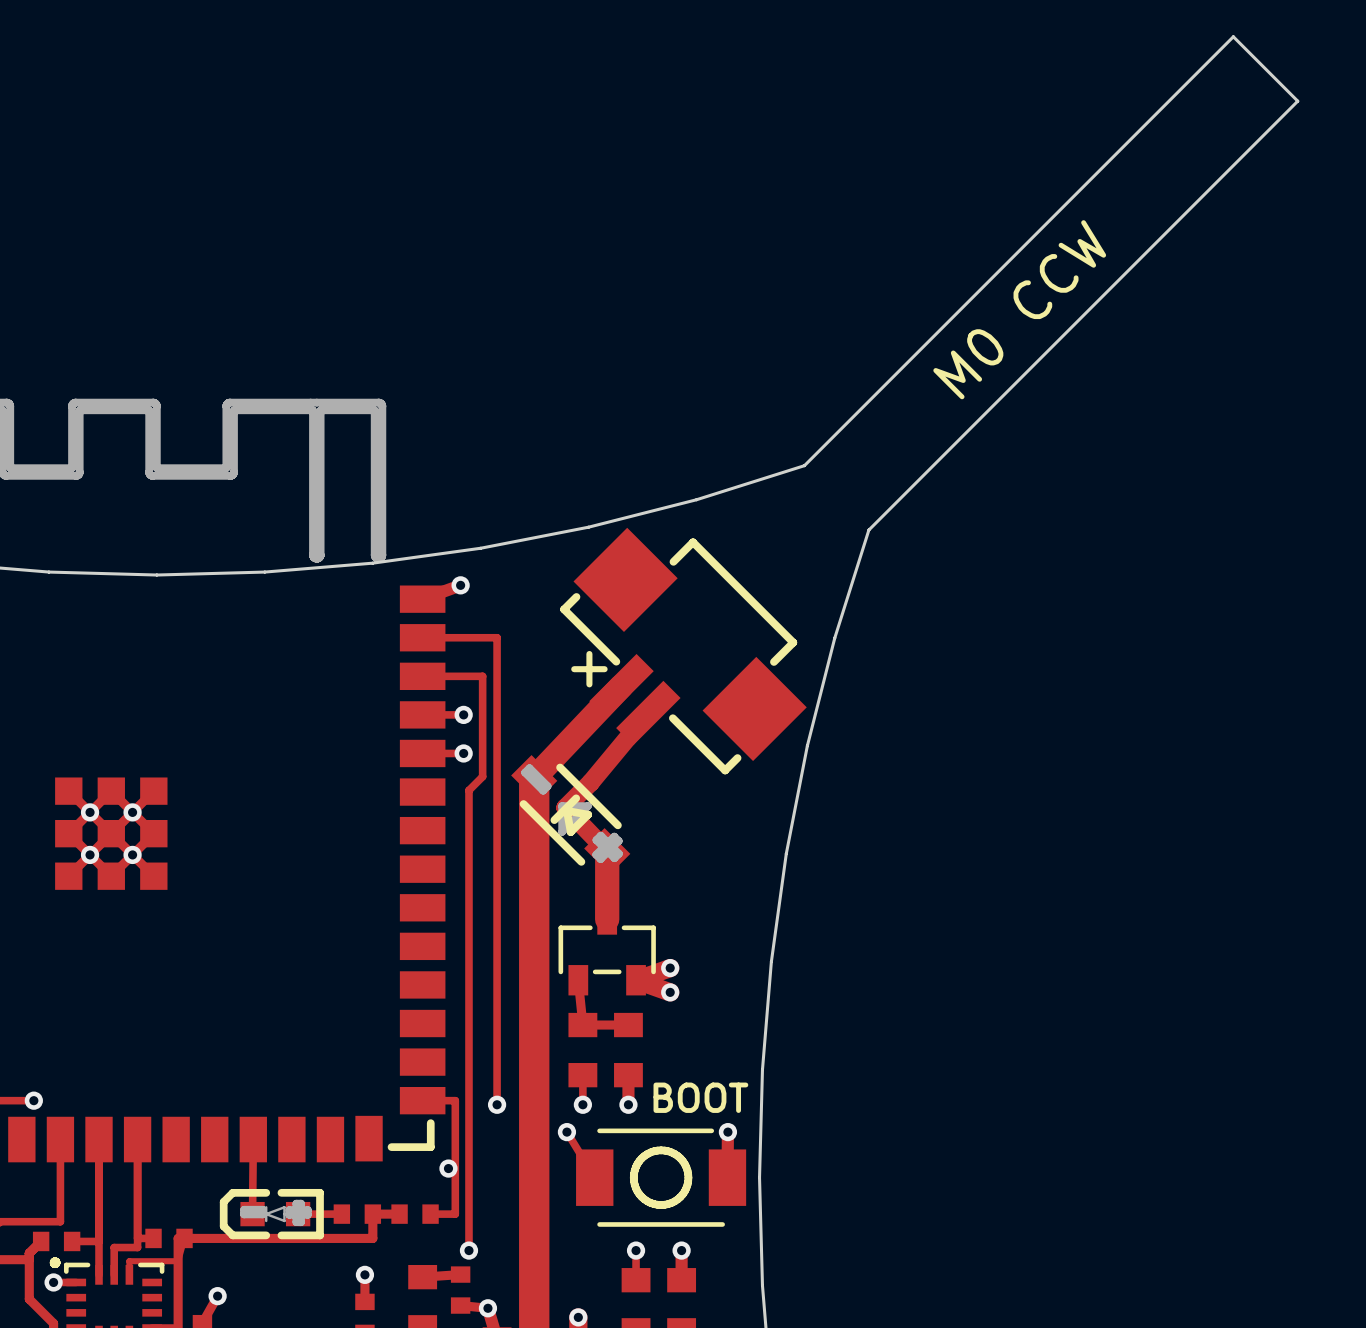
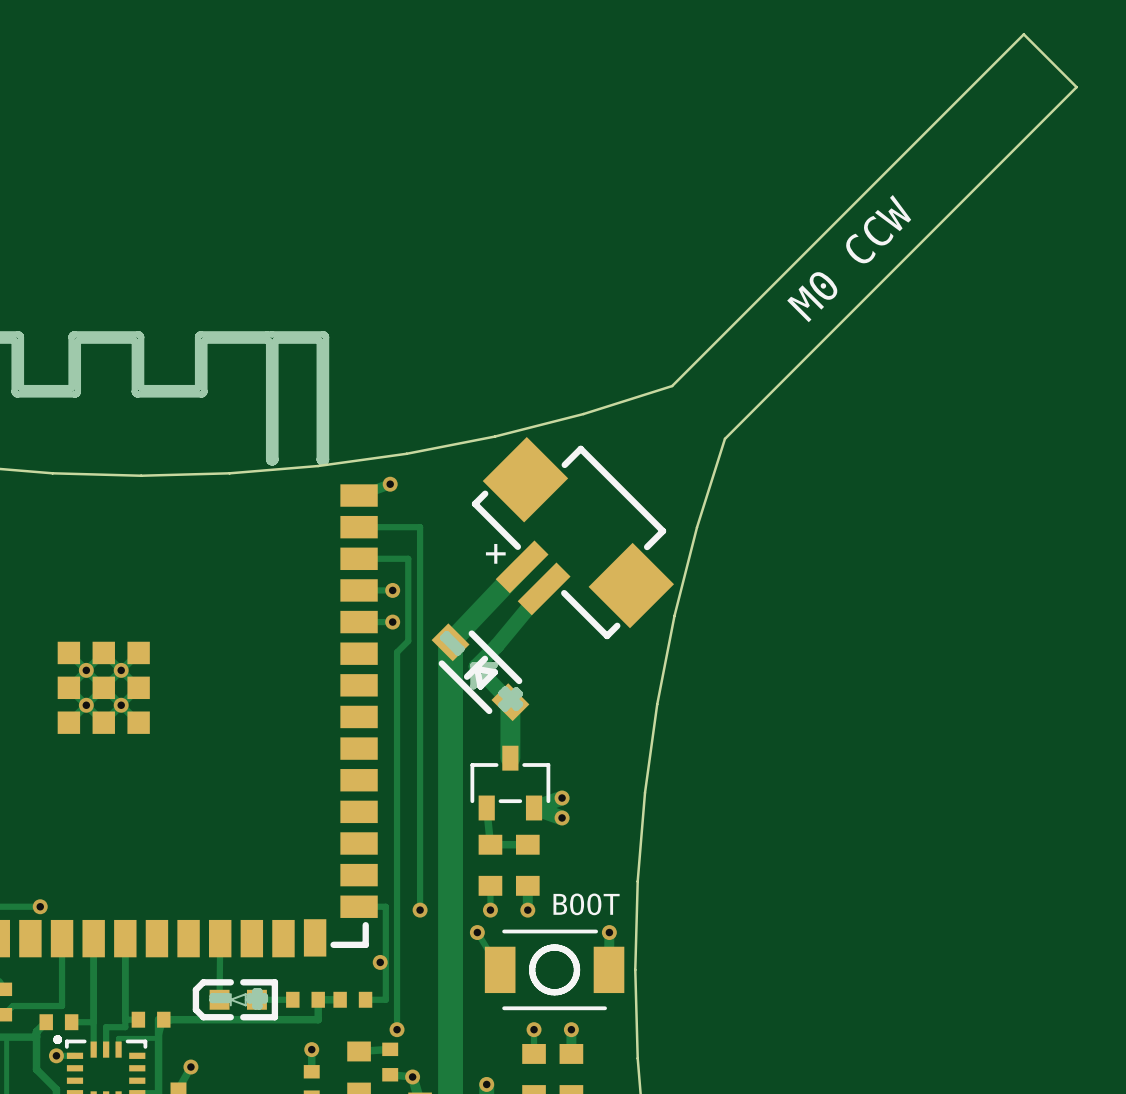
line: (589, 654) (589, 684) -> none
line: (574, 669) (604, 669) -> none
text: none -> + (495, 553)

